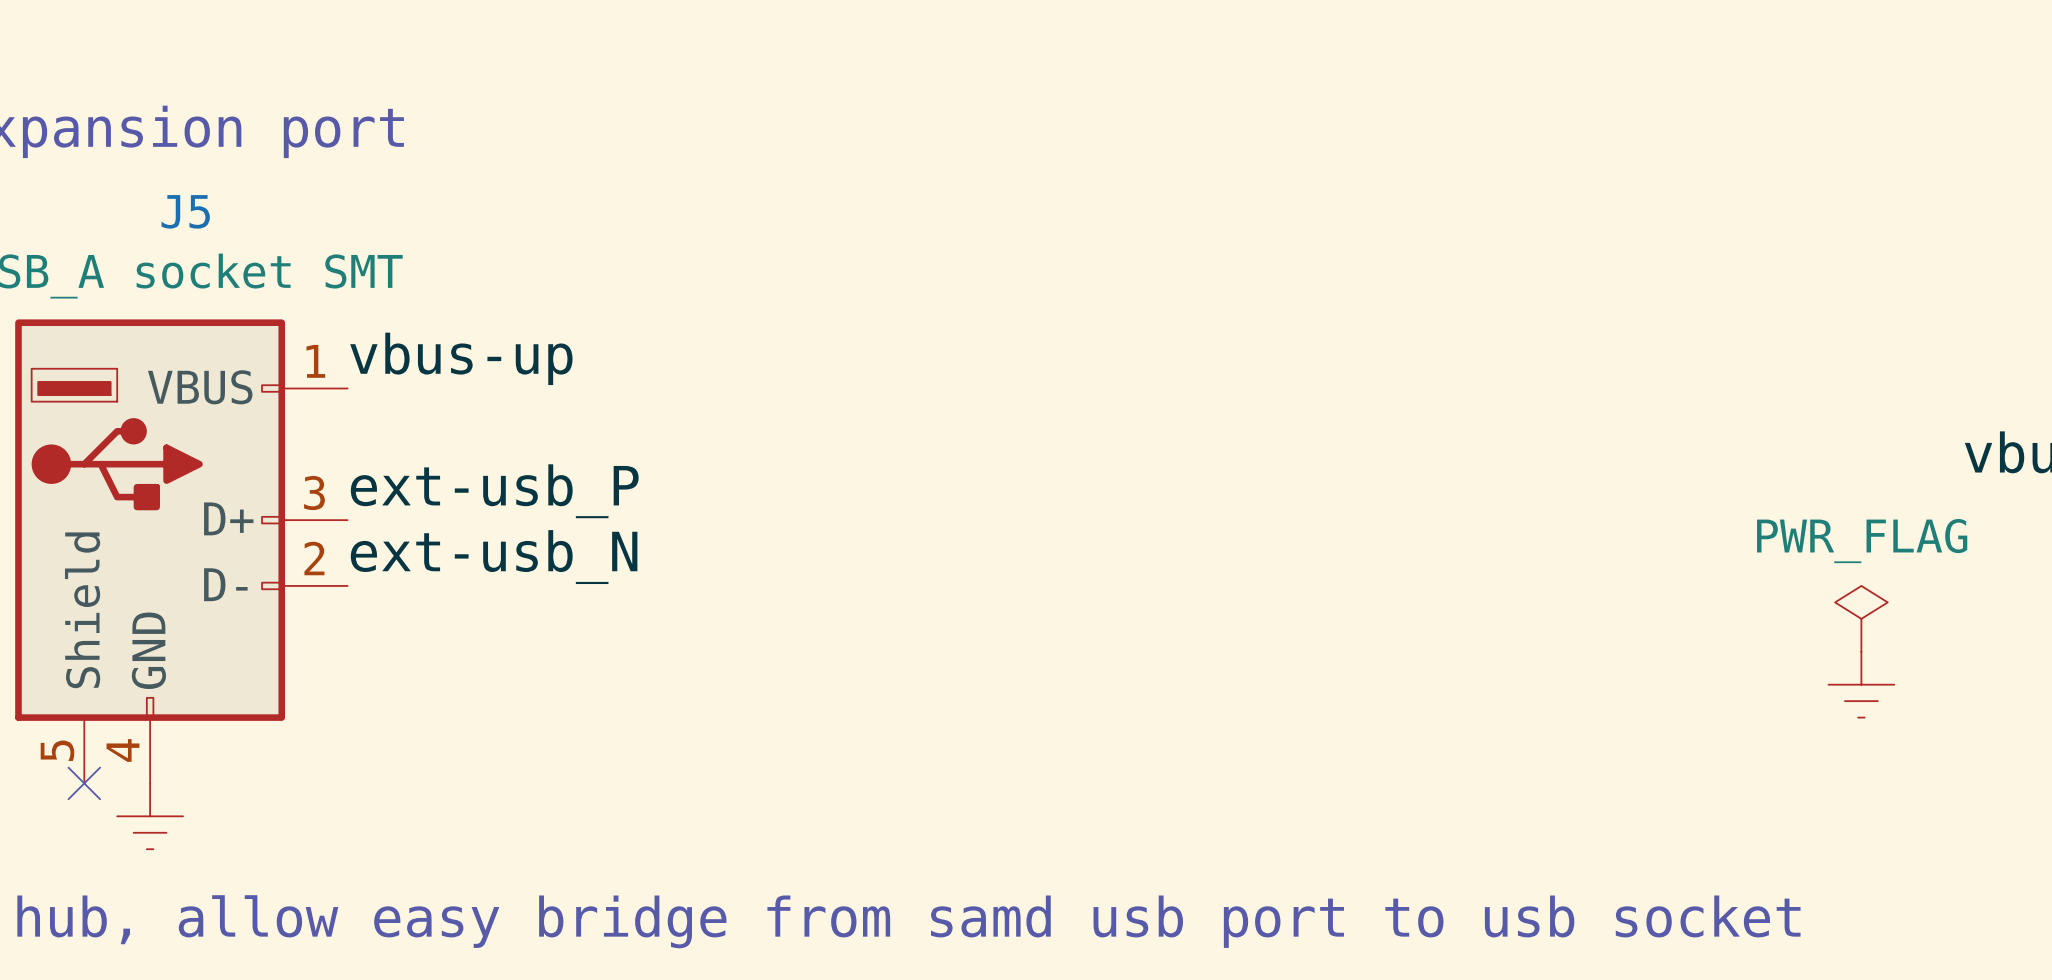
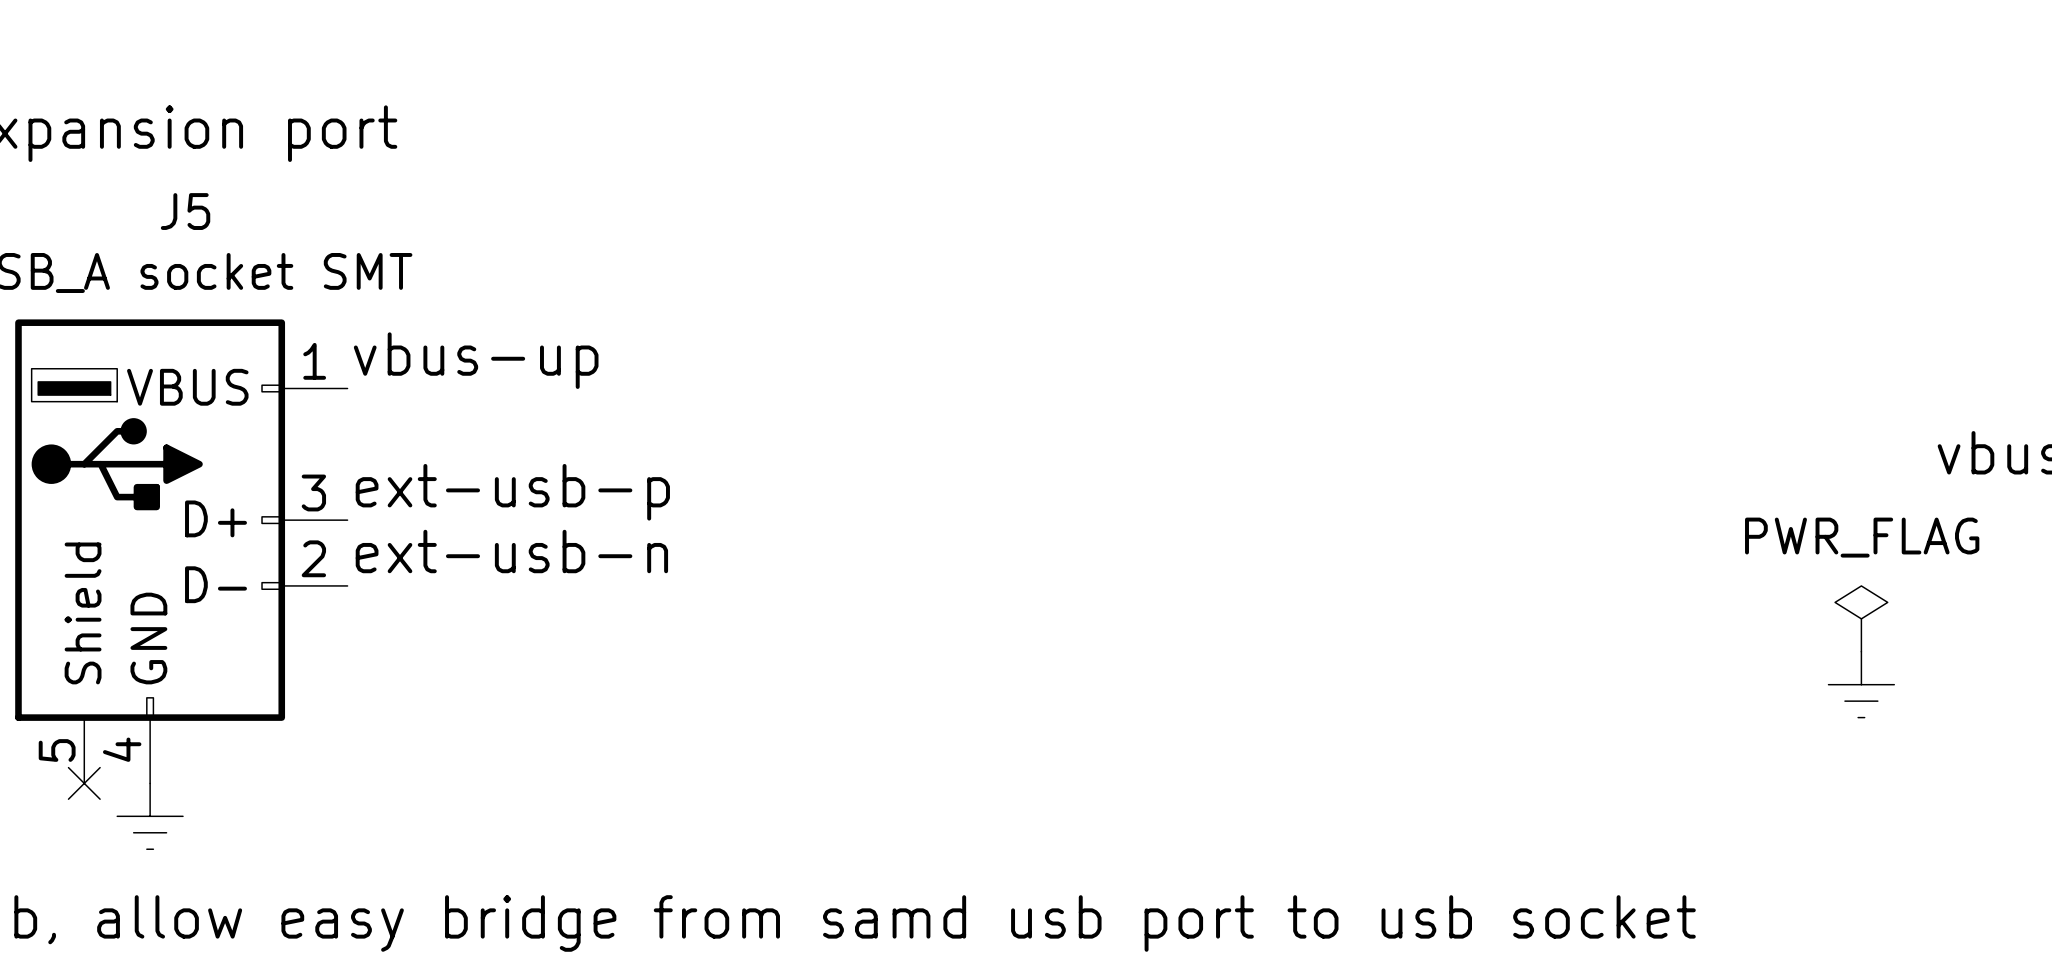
label: ext-usb_P (494, 491) -> ext-usb-p (512, 492)
label: ext-usb_N (494, 557) -> ext-usb-n (511, 551)

